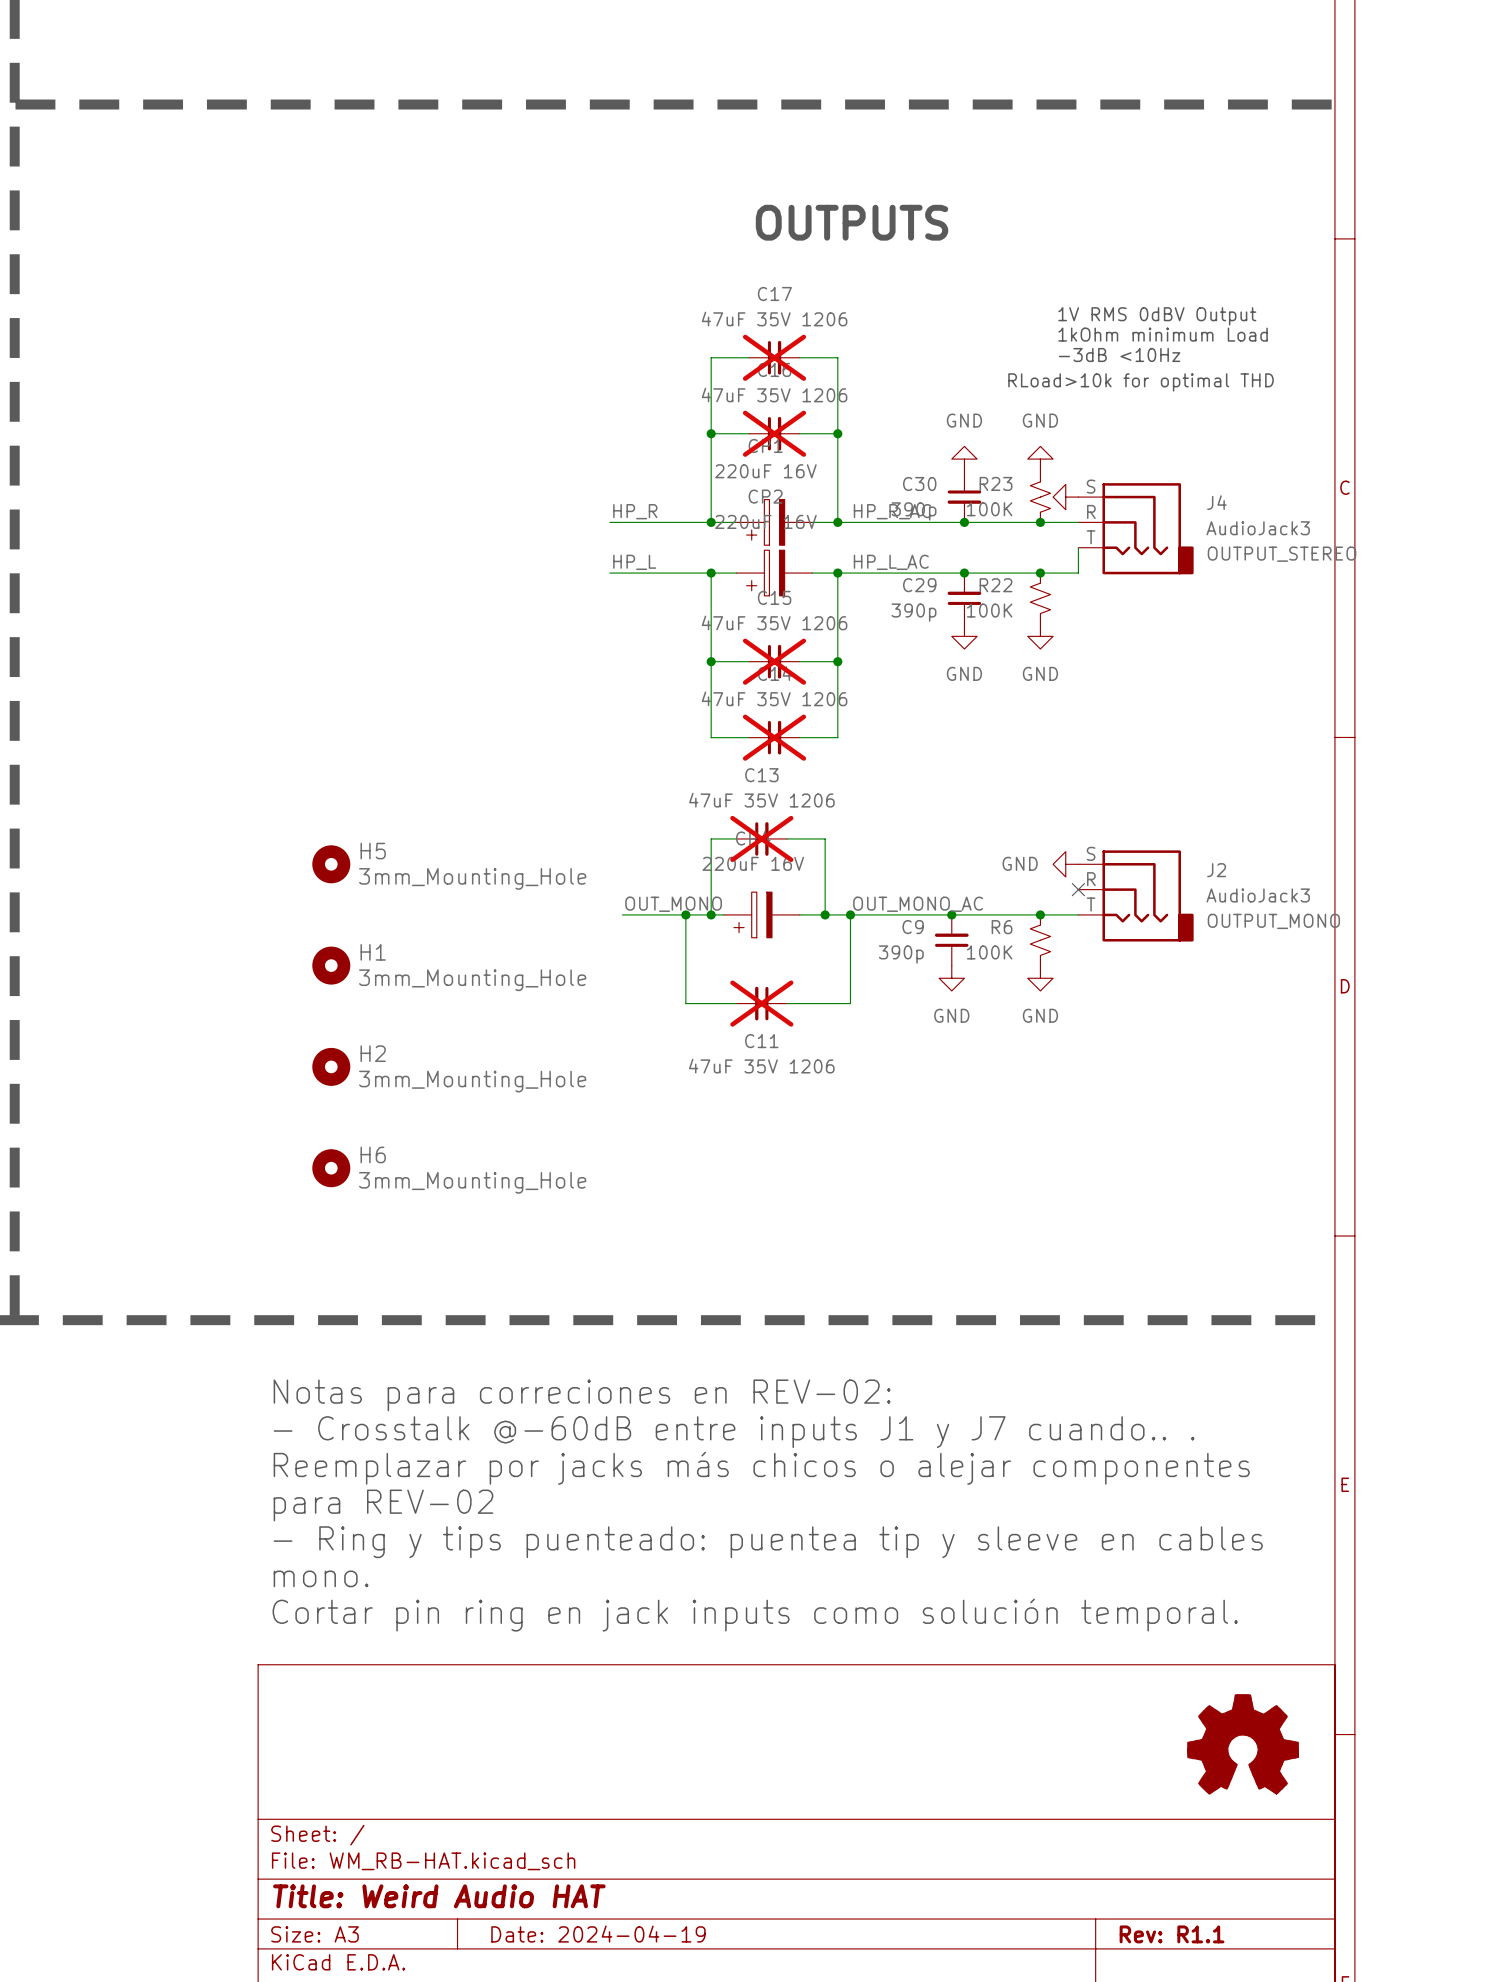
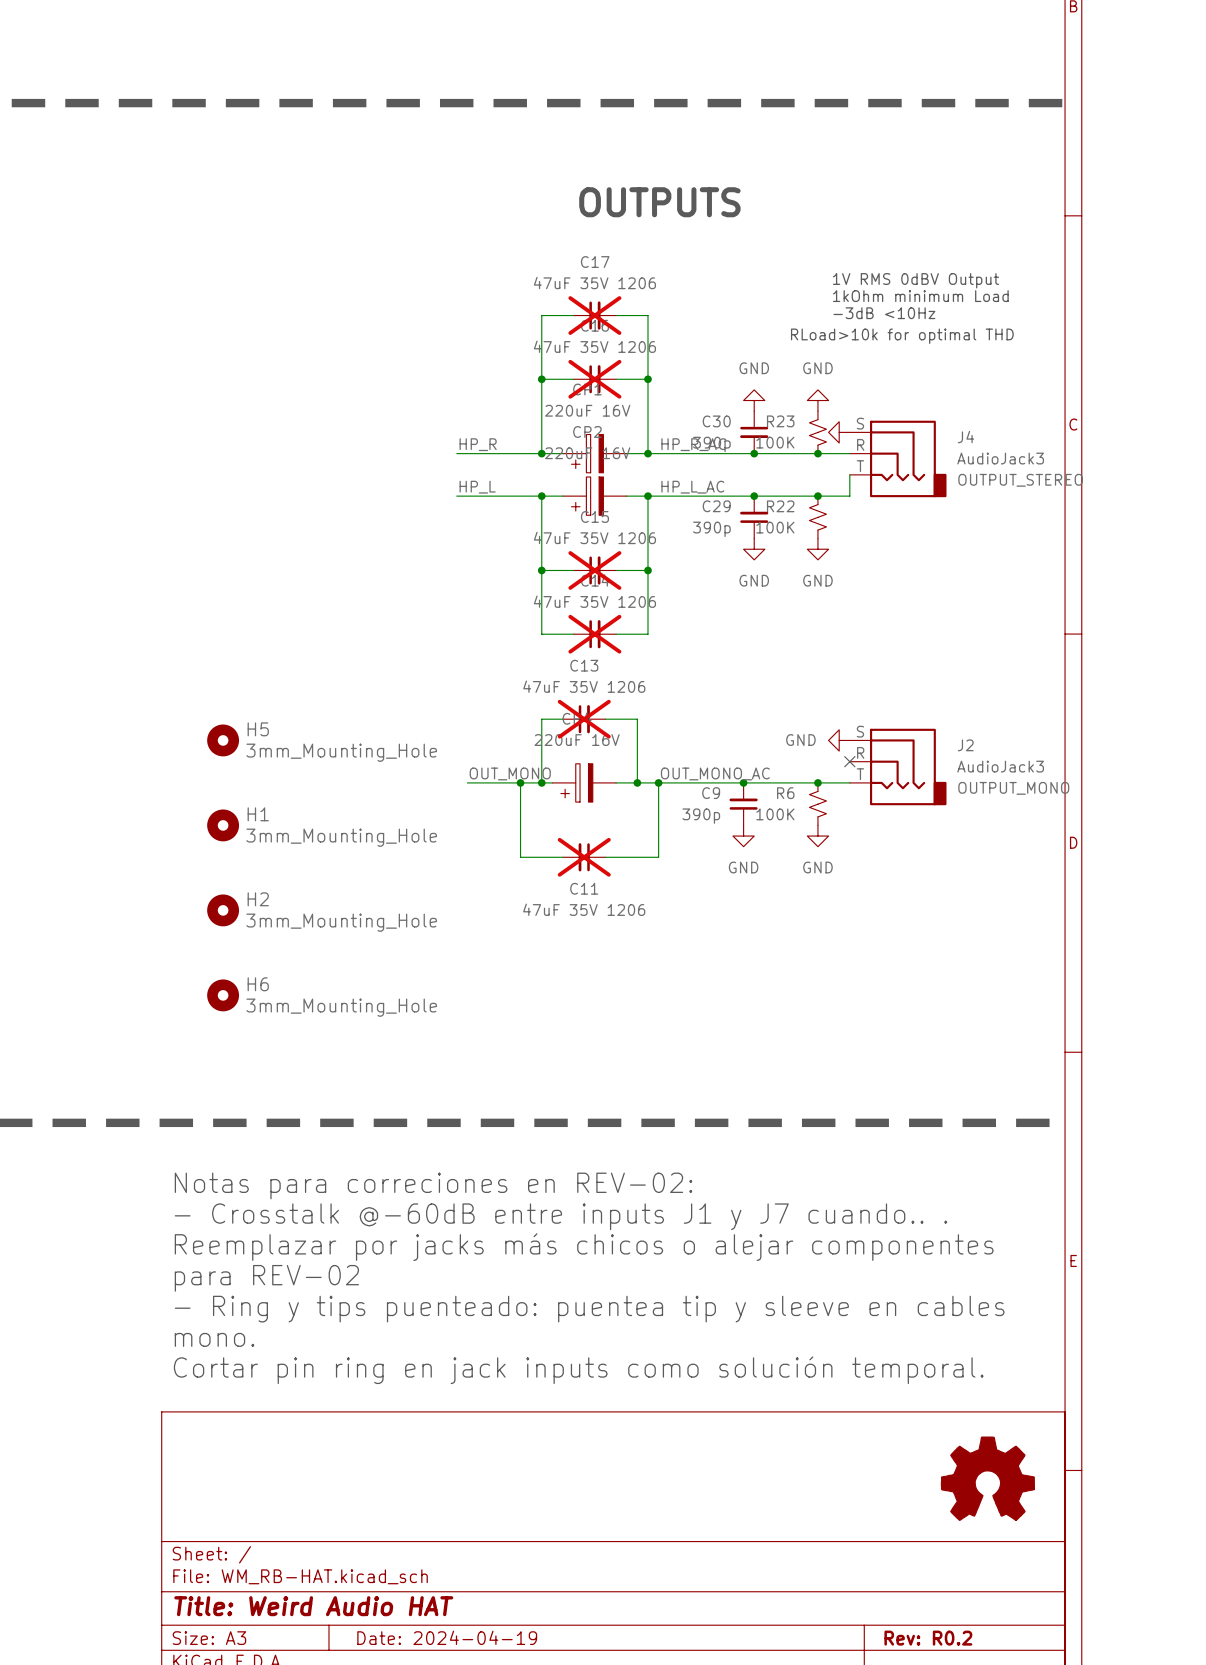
title block: Rev: R1.1 (1172, 1934) -> Rev: R0.2 (928, 1638)

